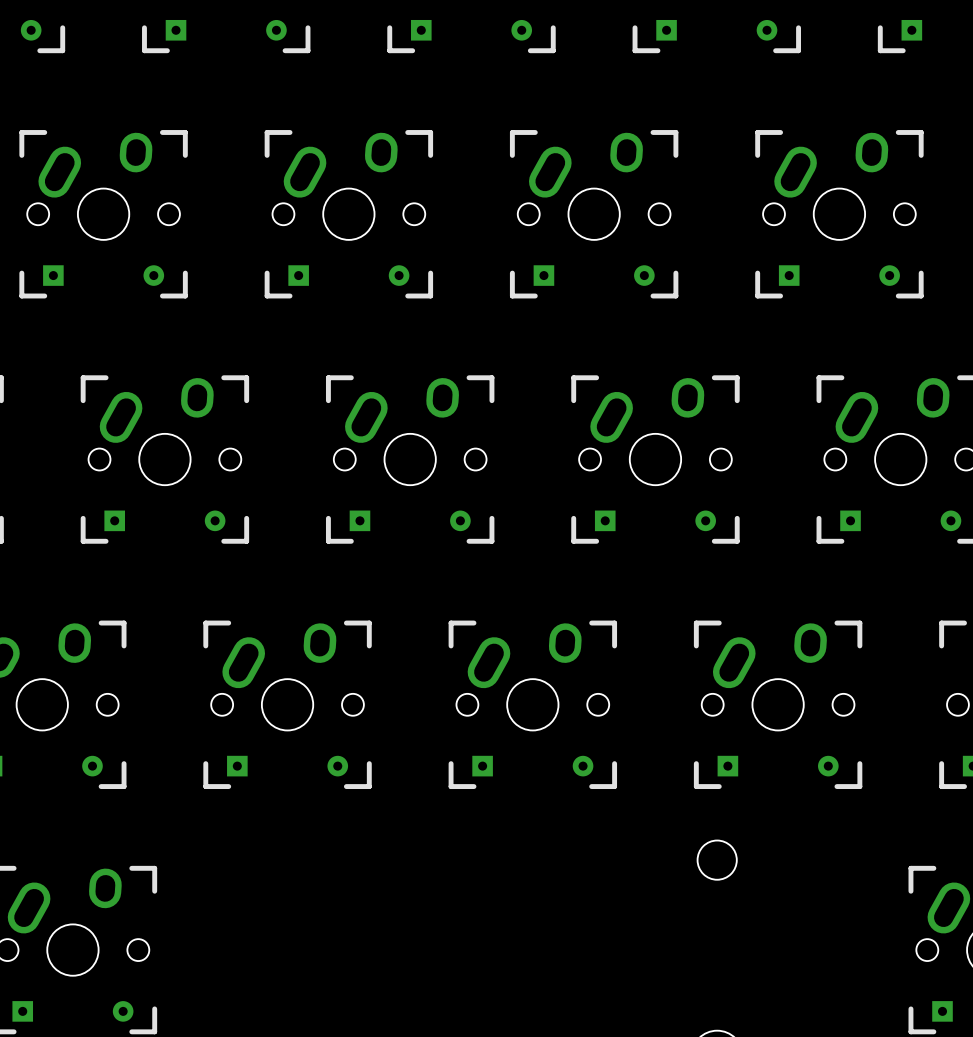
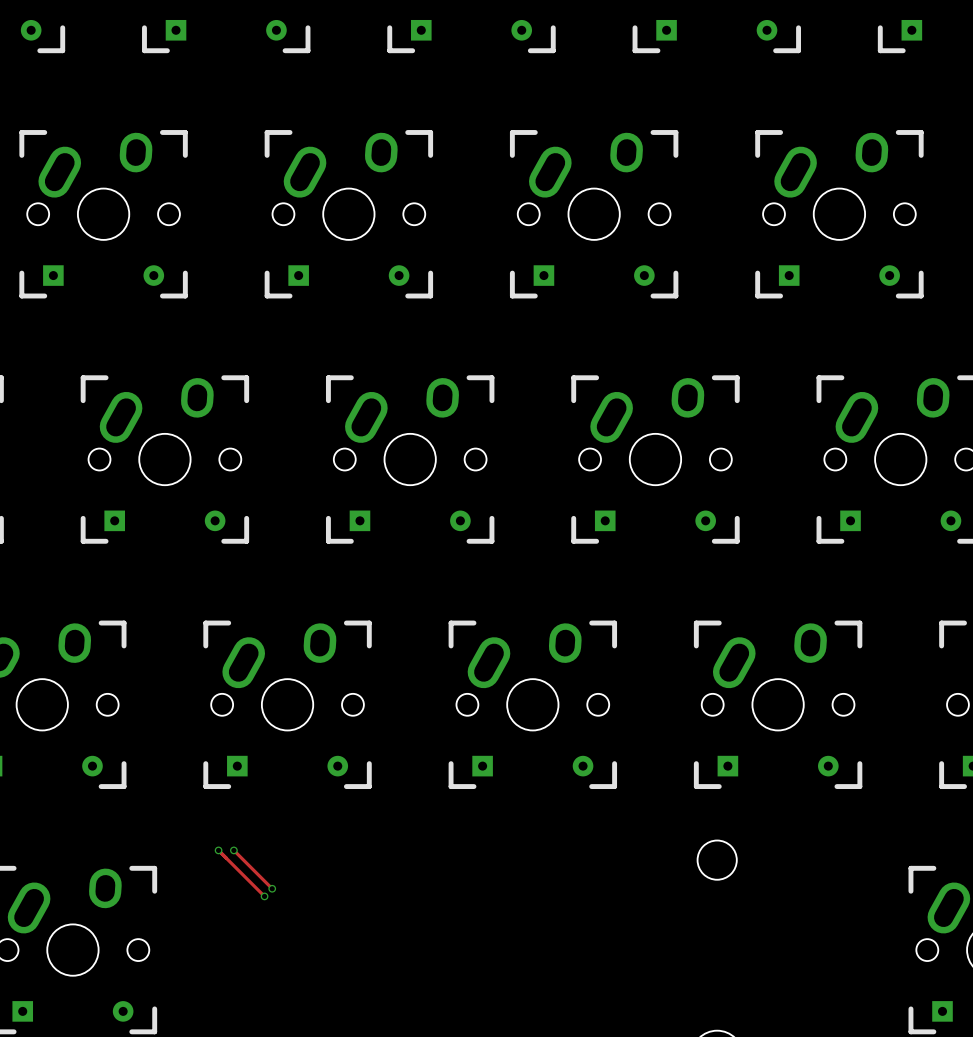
track: none -> (218, 850) (264, 896)
via: none -> (218, 850)
track: none -> (233, 850) (272, 888)
via: none -> (233, 850)
via: none -> (272, 888)
via: none -> (264, 896)

